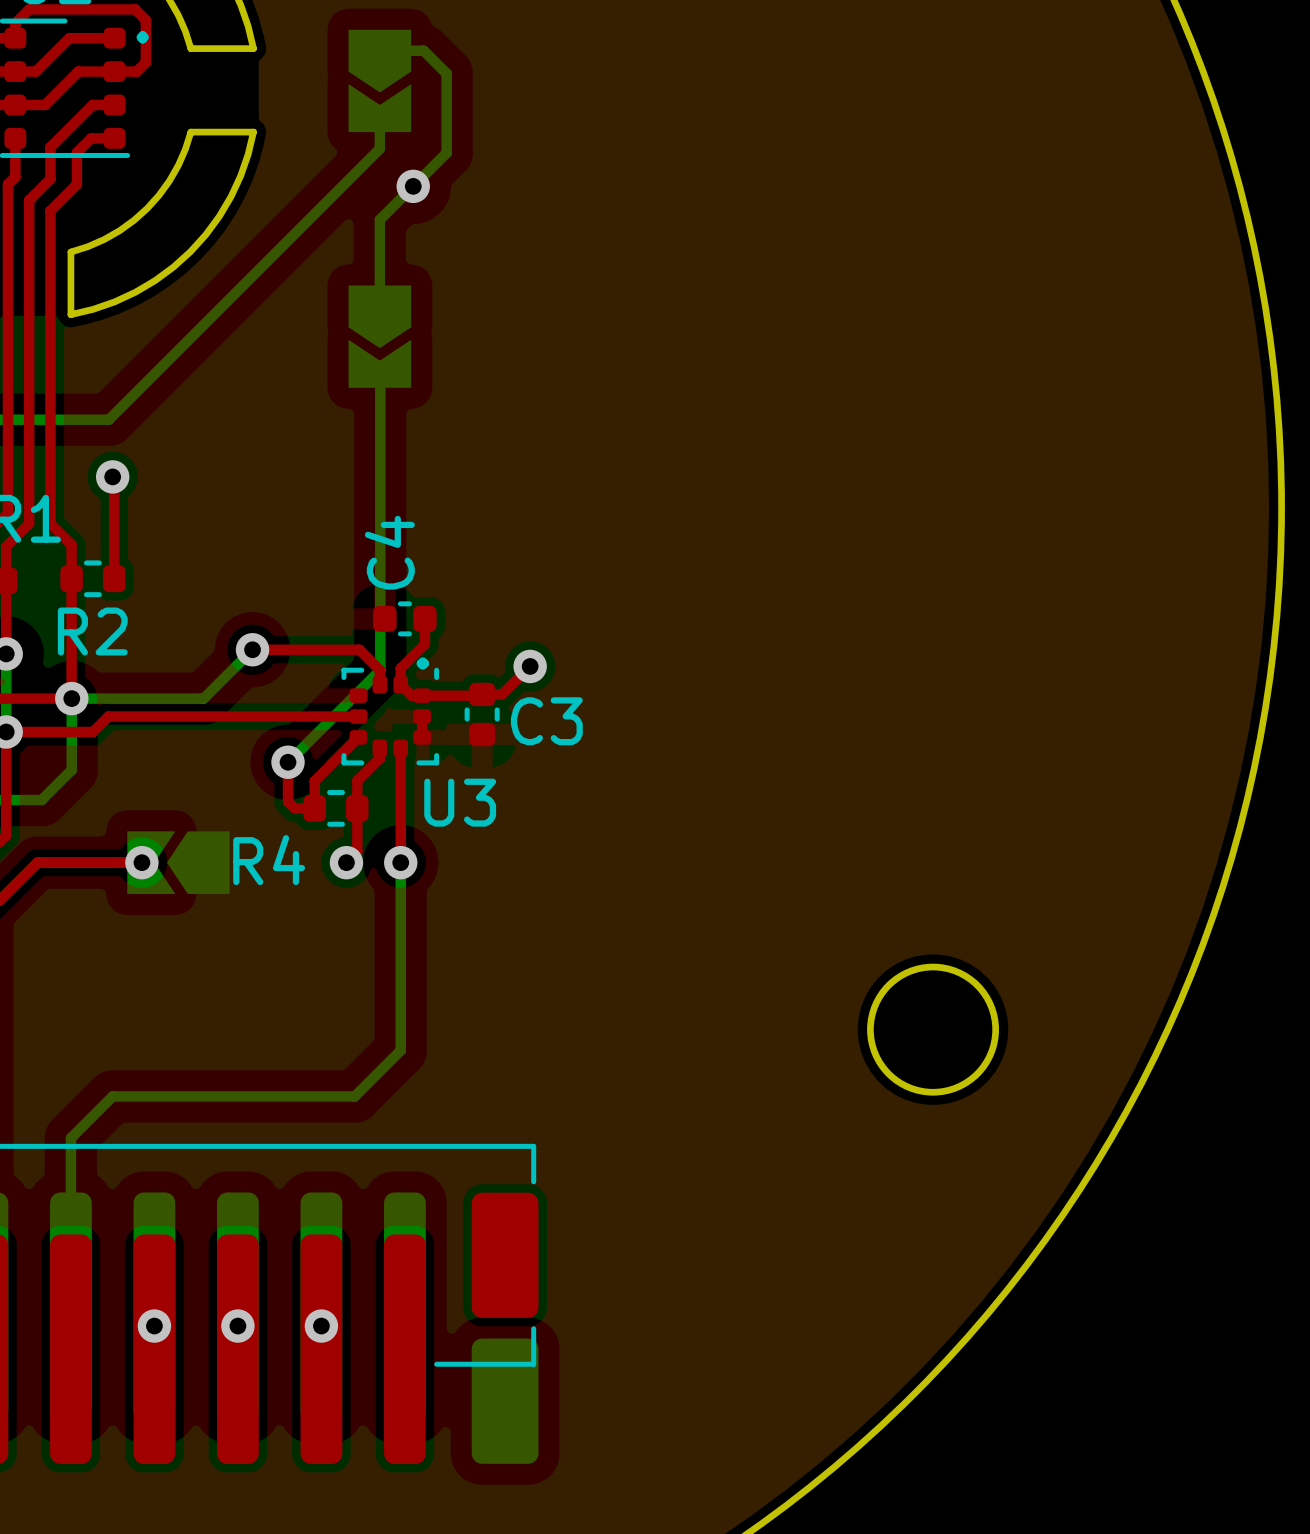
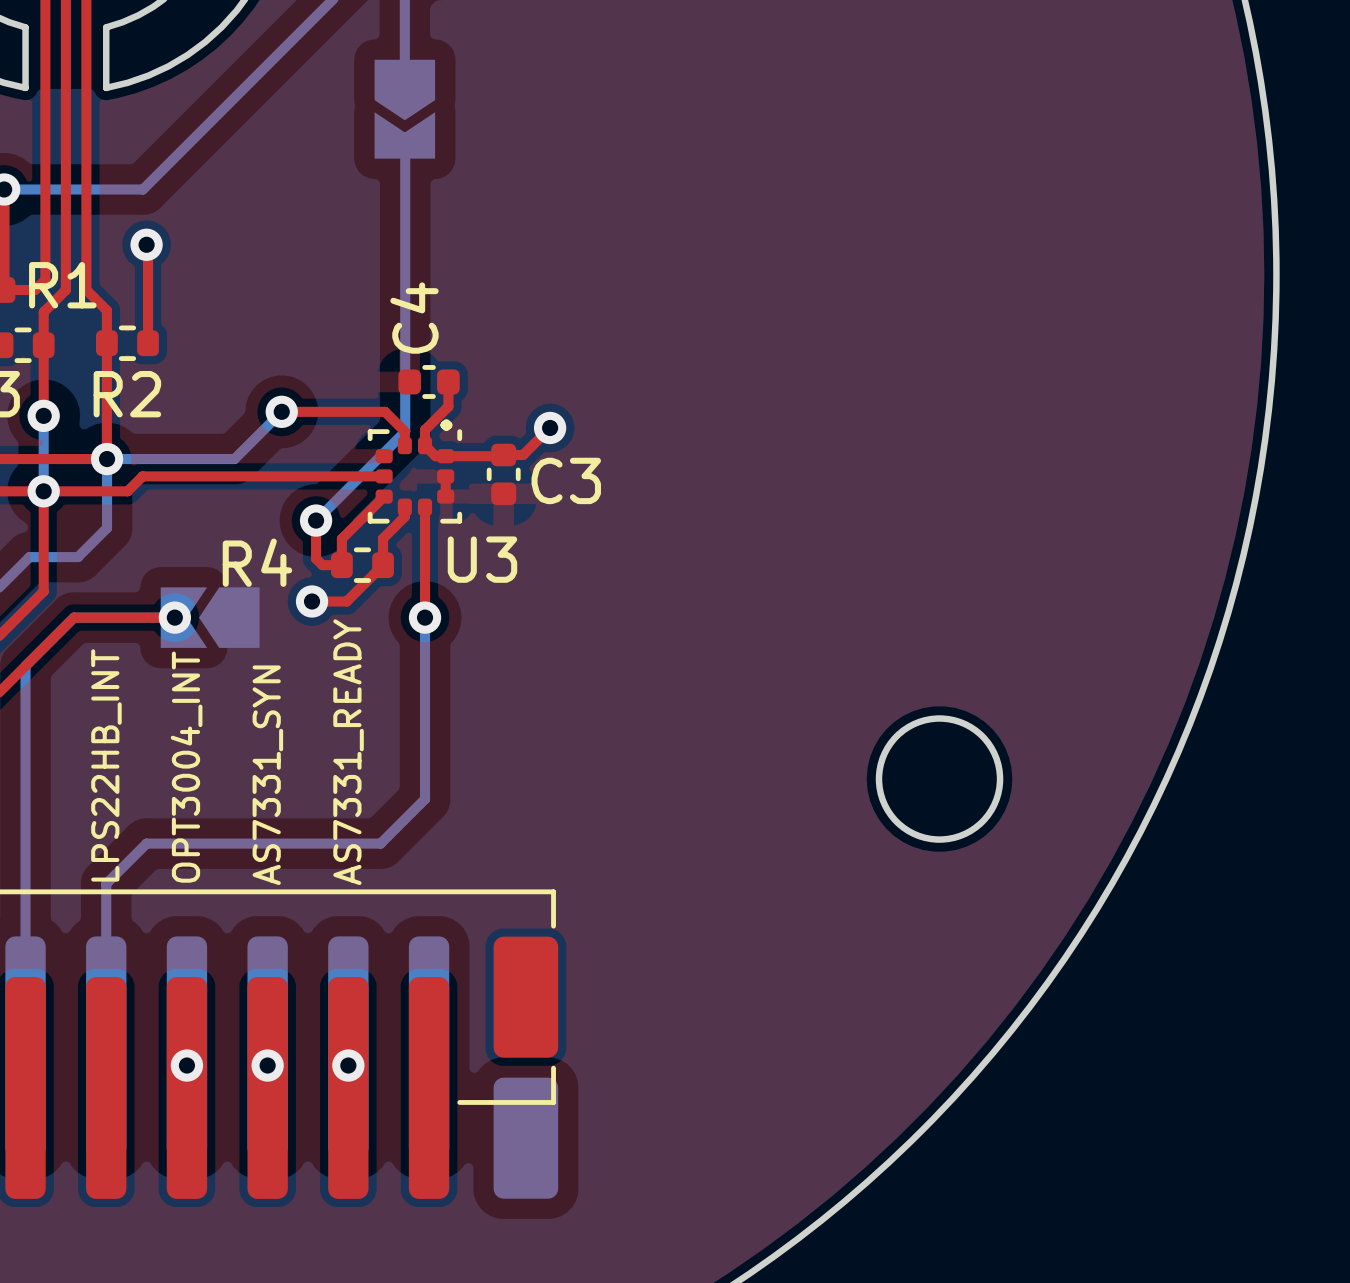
top track: (357, 808) (357, 851) (346, 862) -> (383, 565) (346, 601) (312, 601)
R4 name position: R4 (269, 860) -> R4 (257, 562)
via position: (346, 862) -> (312, 601)
text: none -> AS7331_READY (348, 752)
text: none -> LPS22HB_INT (106, 765)
text: none -> OPT3004_INT (186, 767)
text: none -> AS7331_SYN (267, 775)

